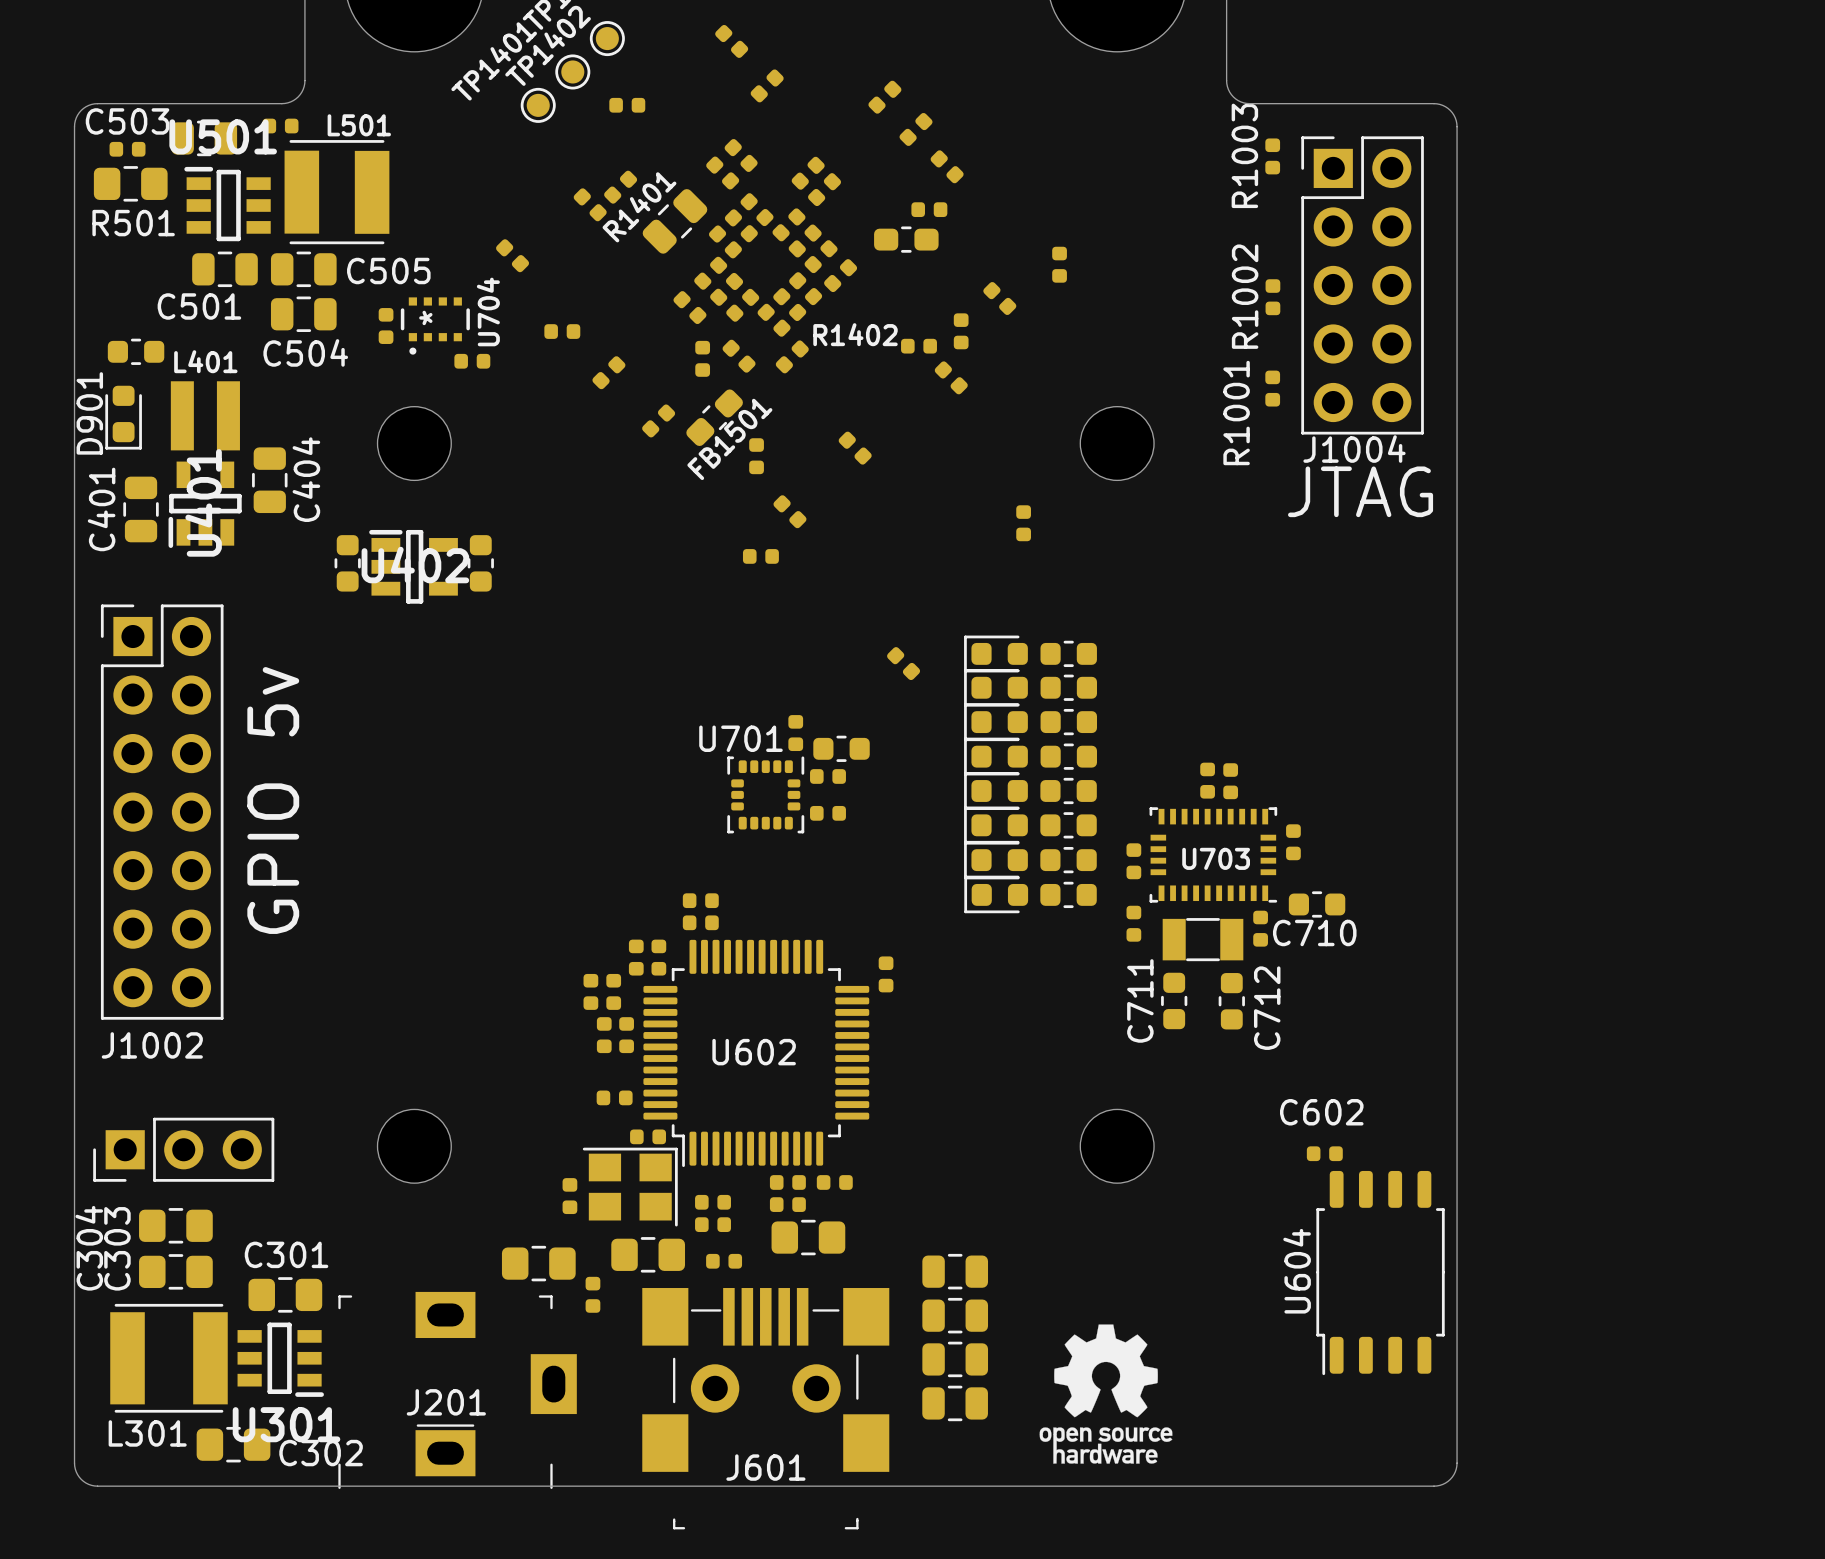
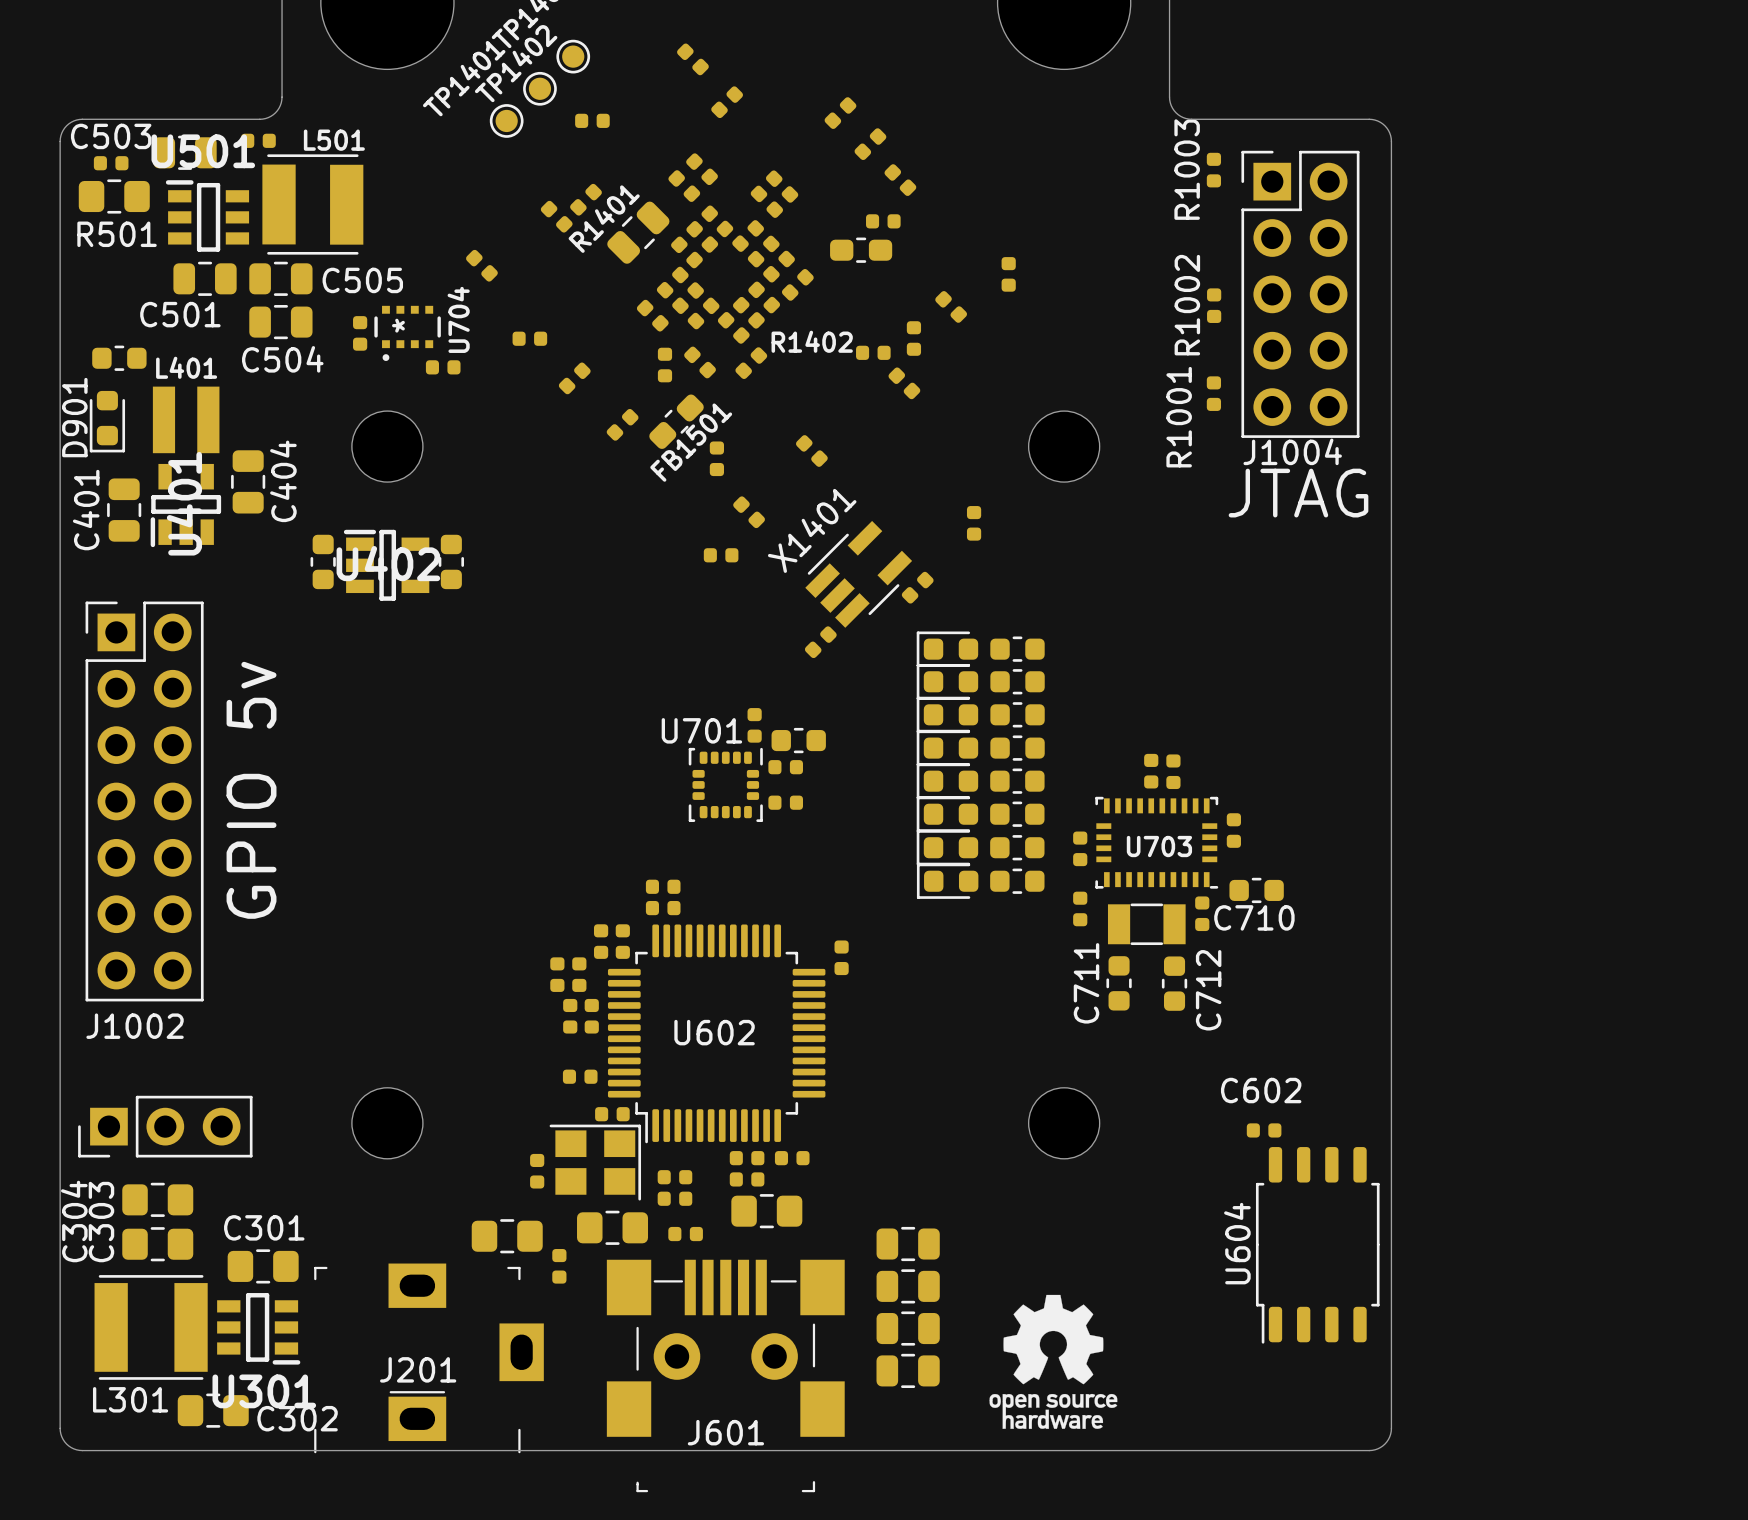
X1401: none -> (858, 574)
part: none -> (917, 587)
part rotation: 0° (903, 663) -> 90° clockwise (820, 642)
part position: (903, 663) -> (820, 642)

